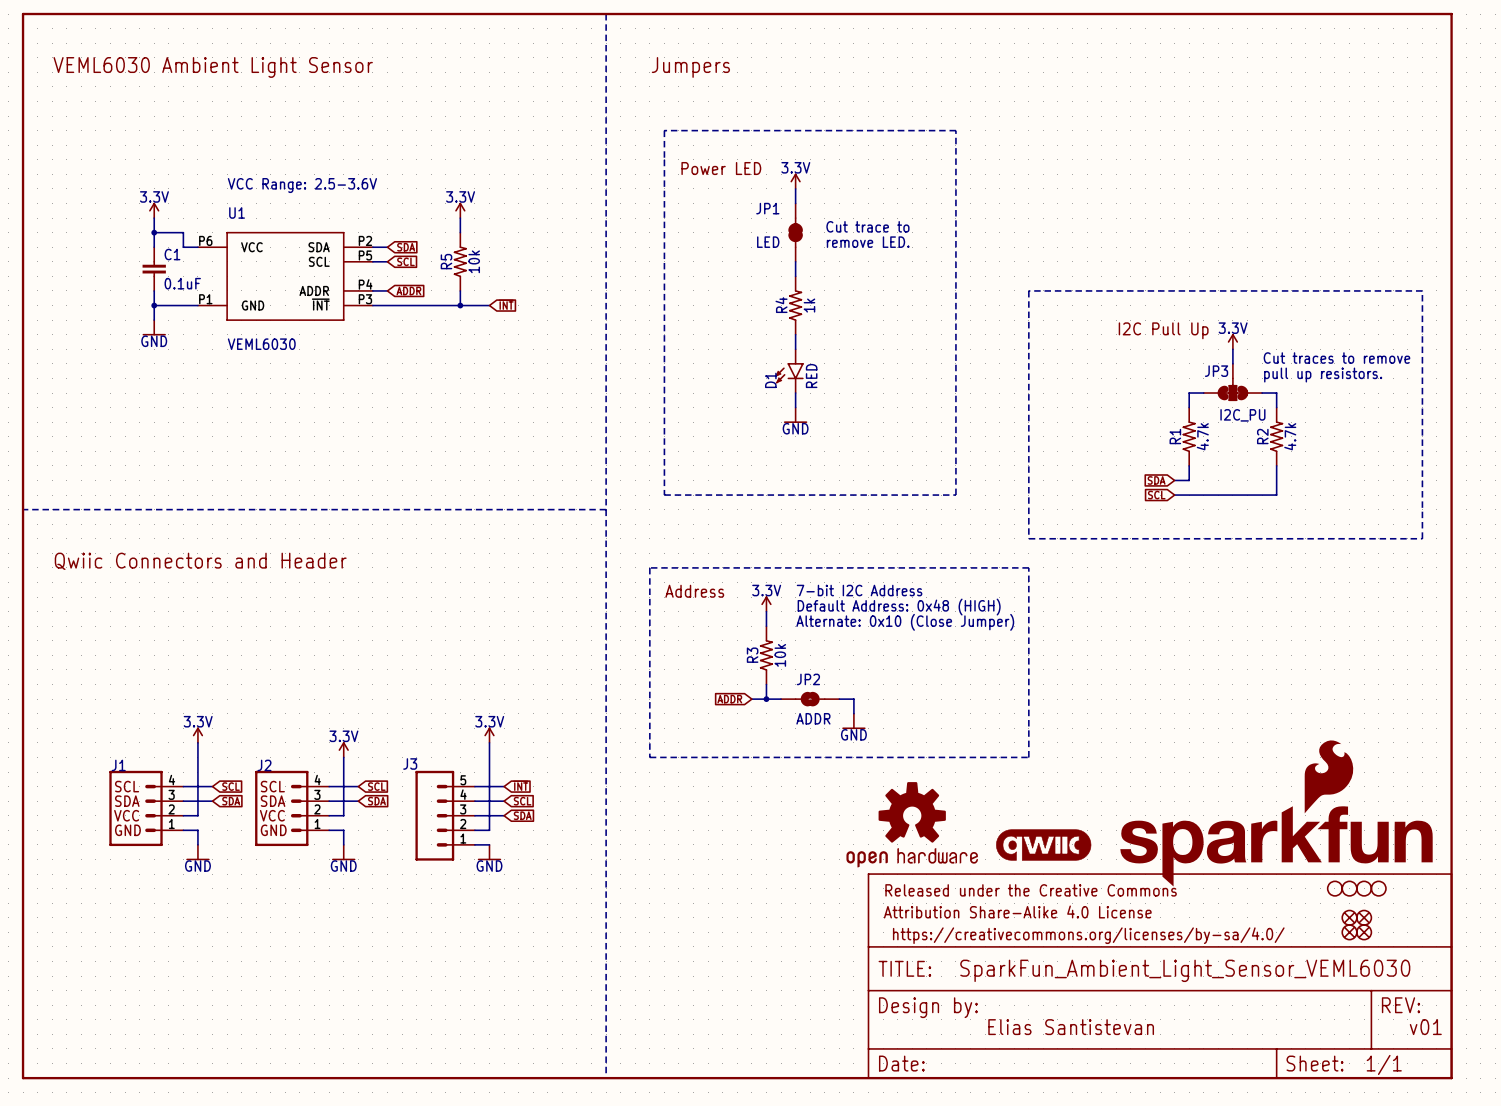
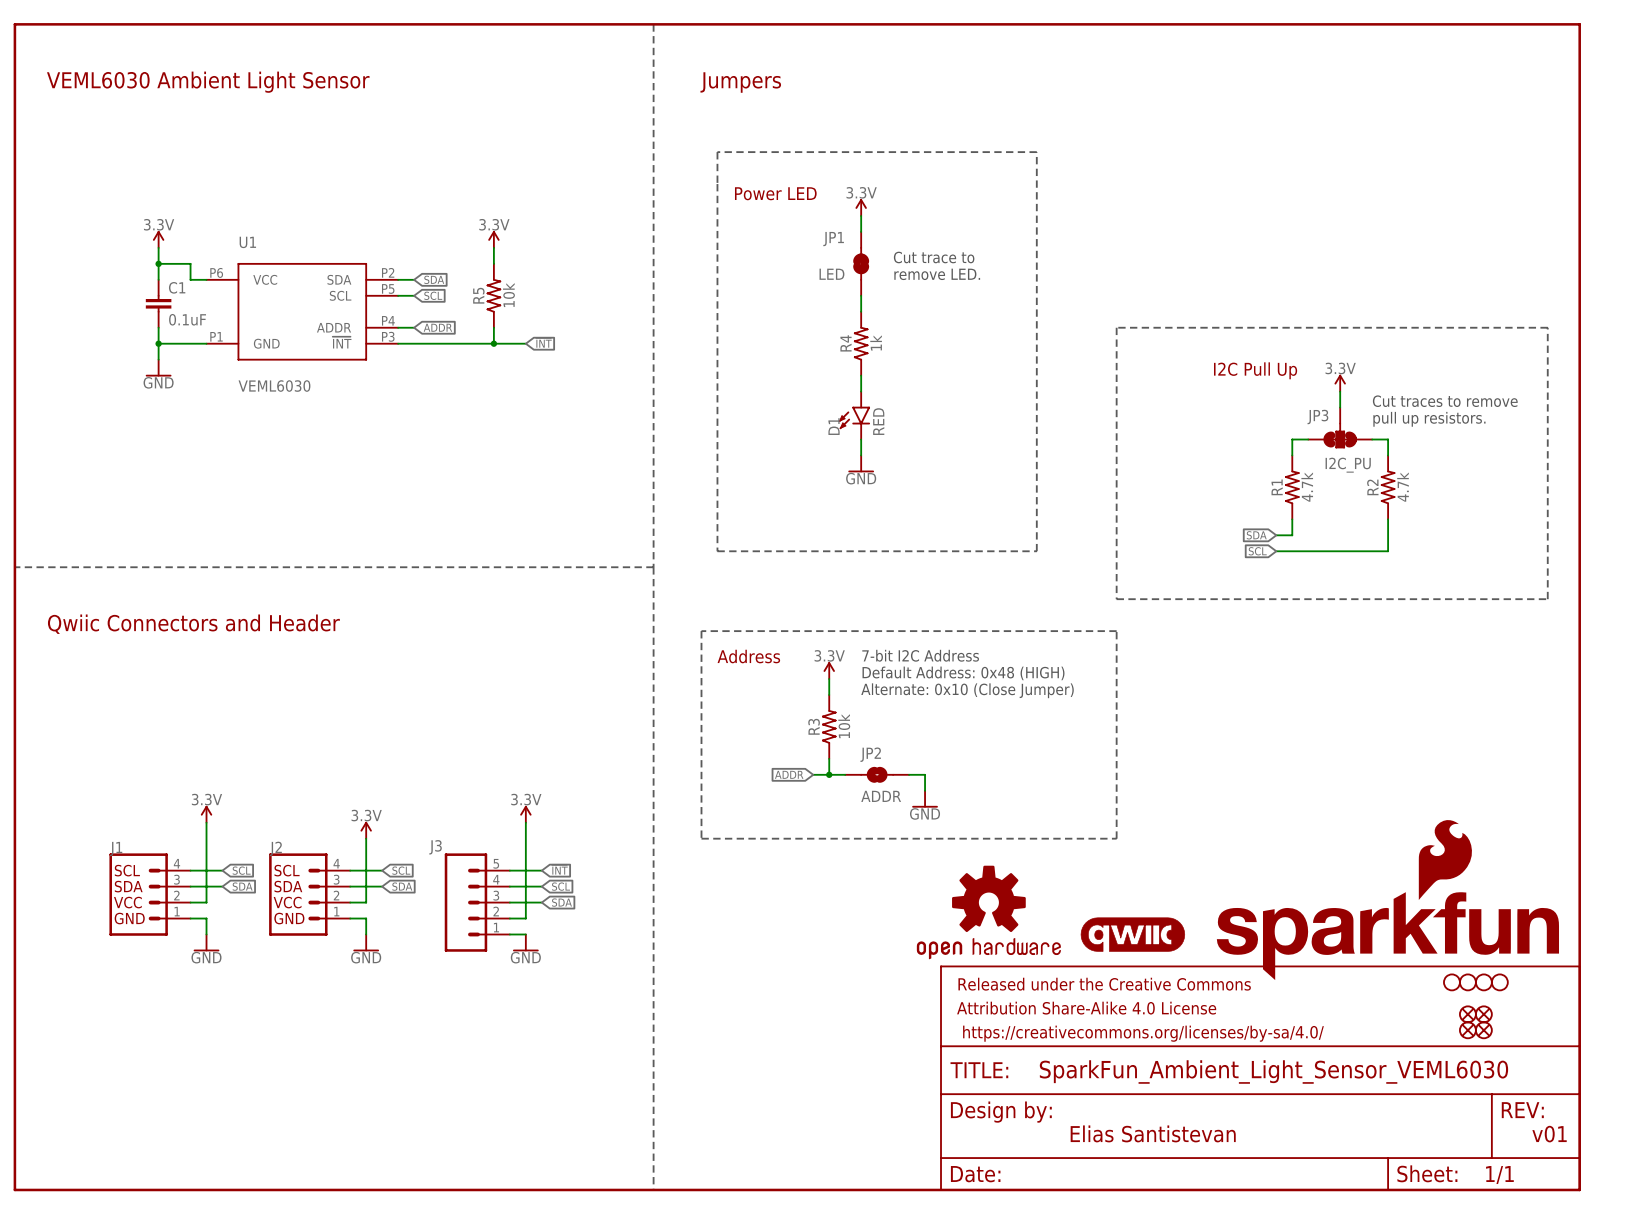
text: VCC Range: 2.5-3.6V (302, 185) -> none

